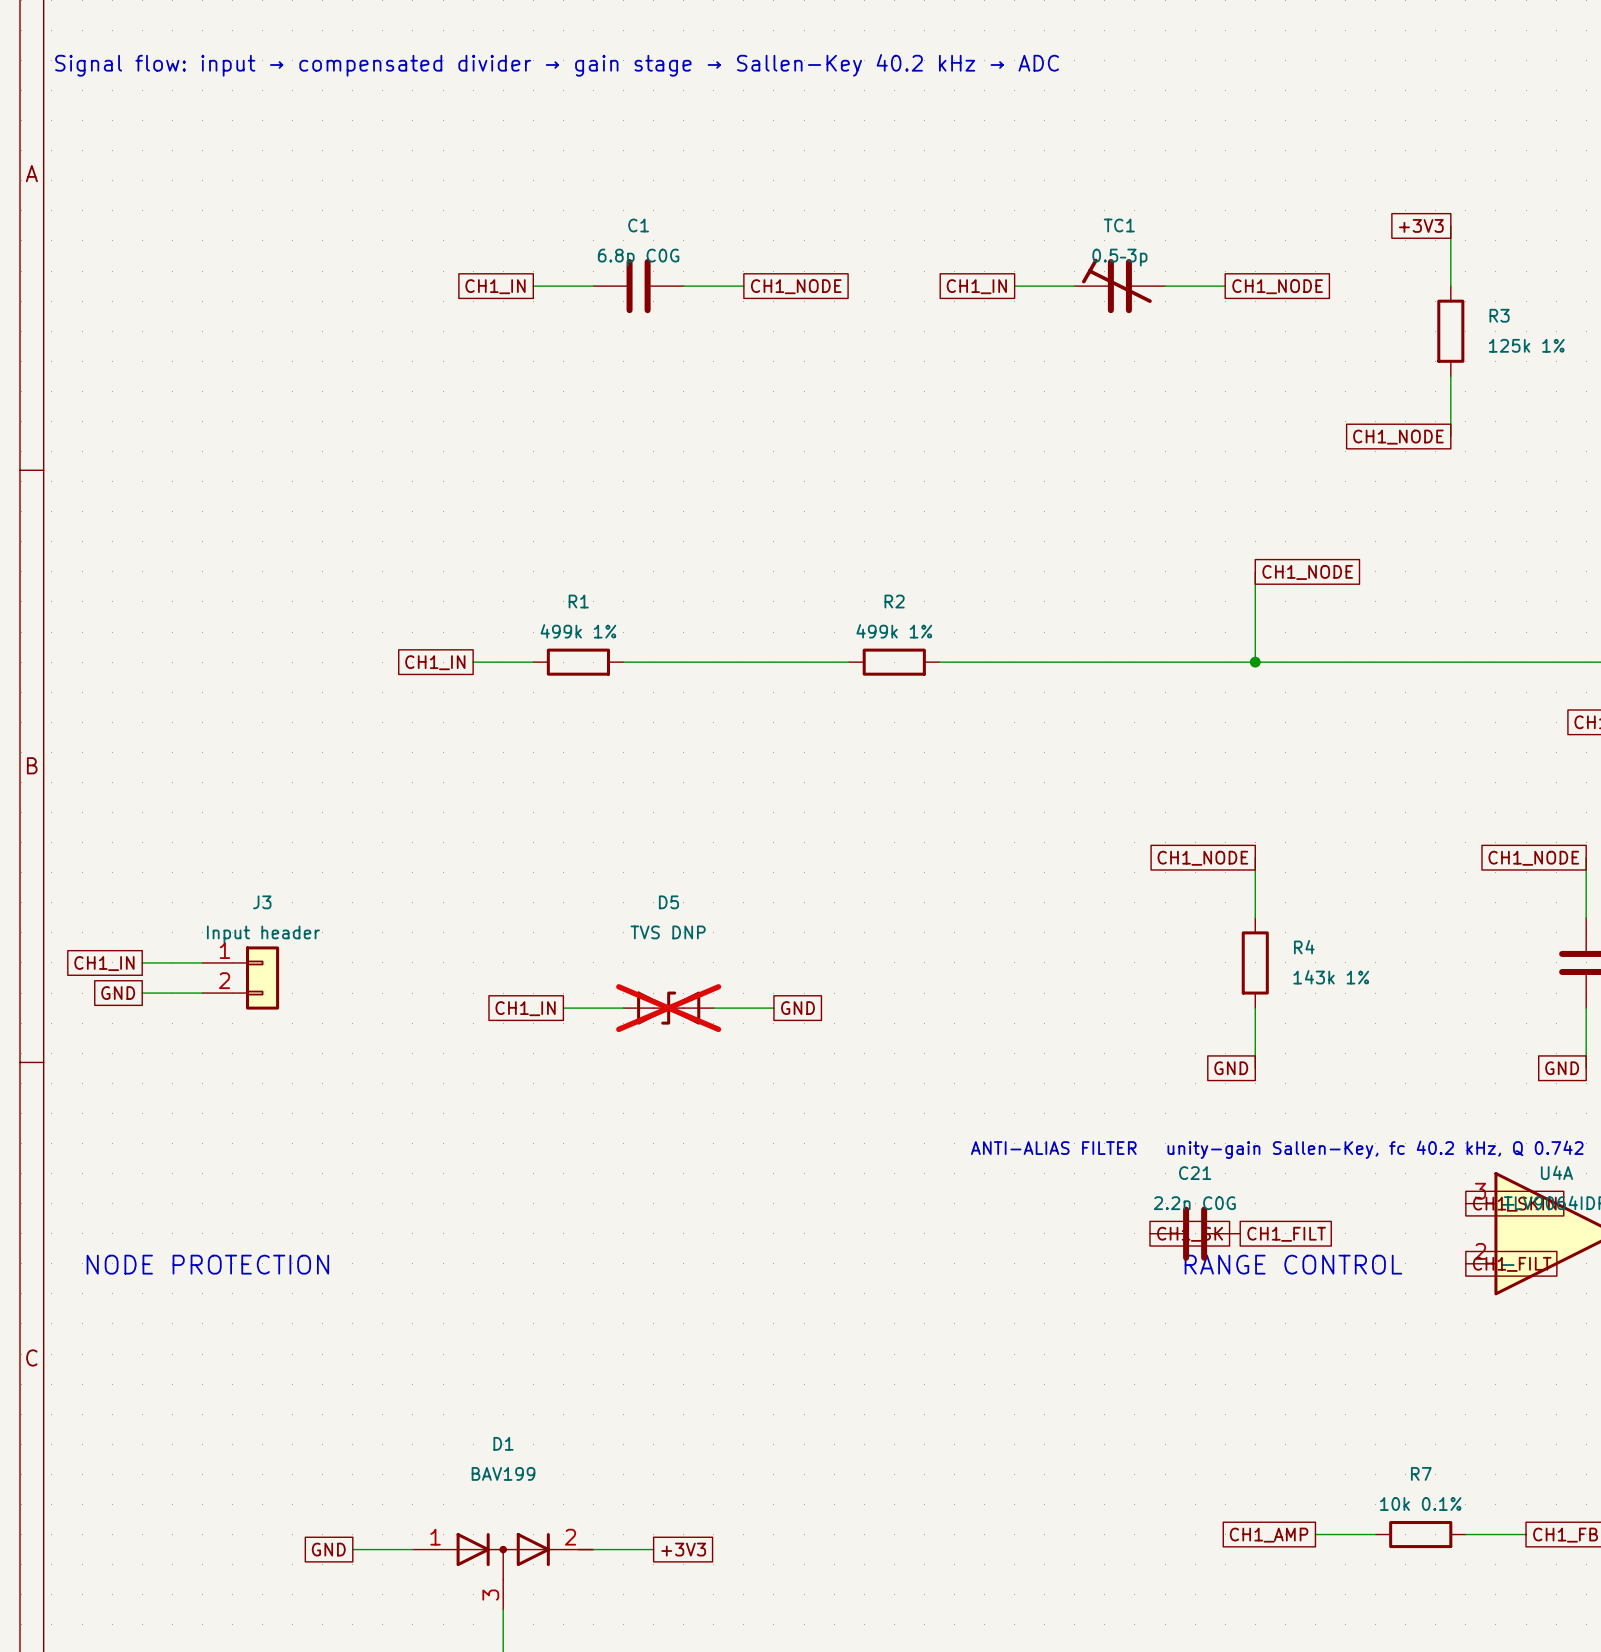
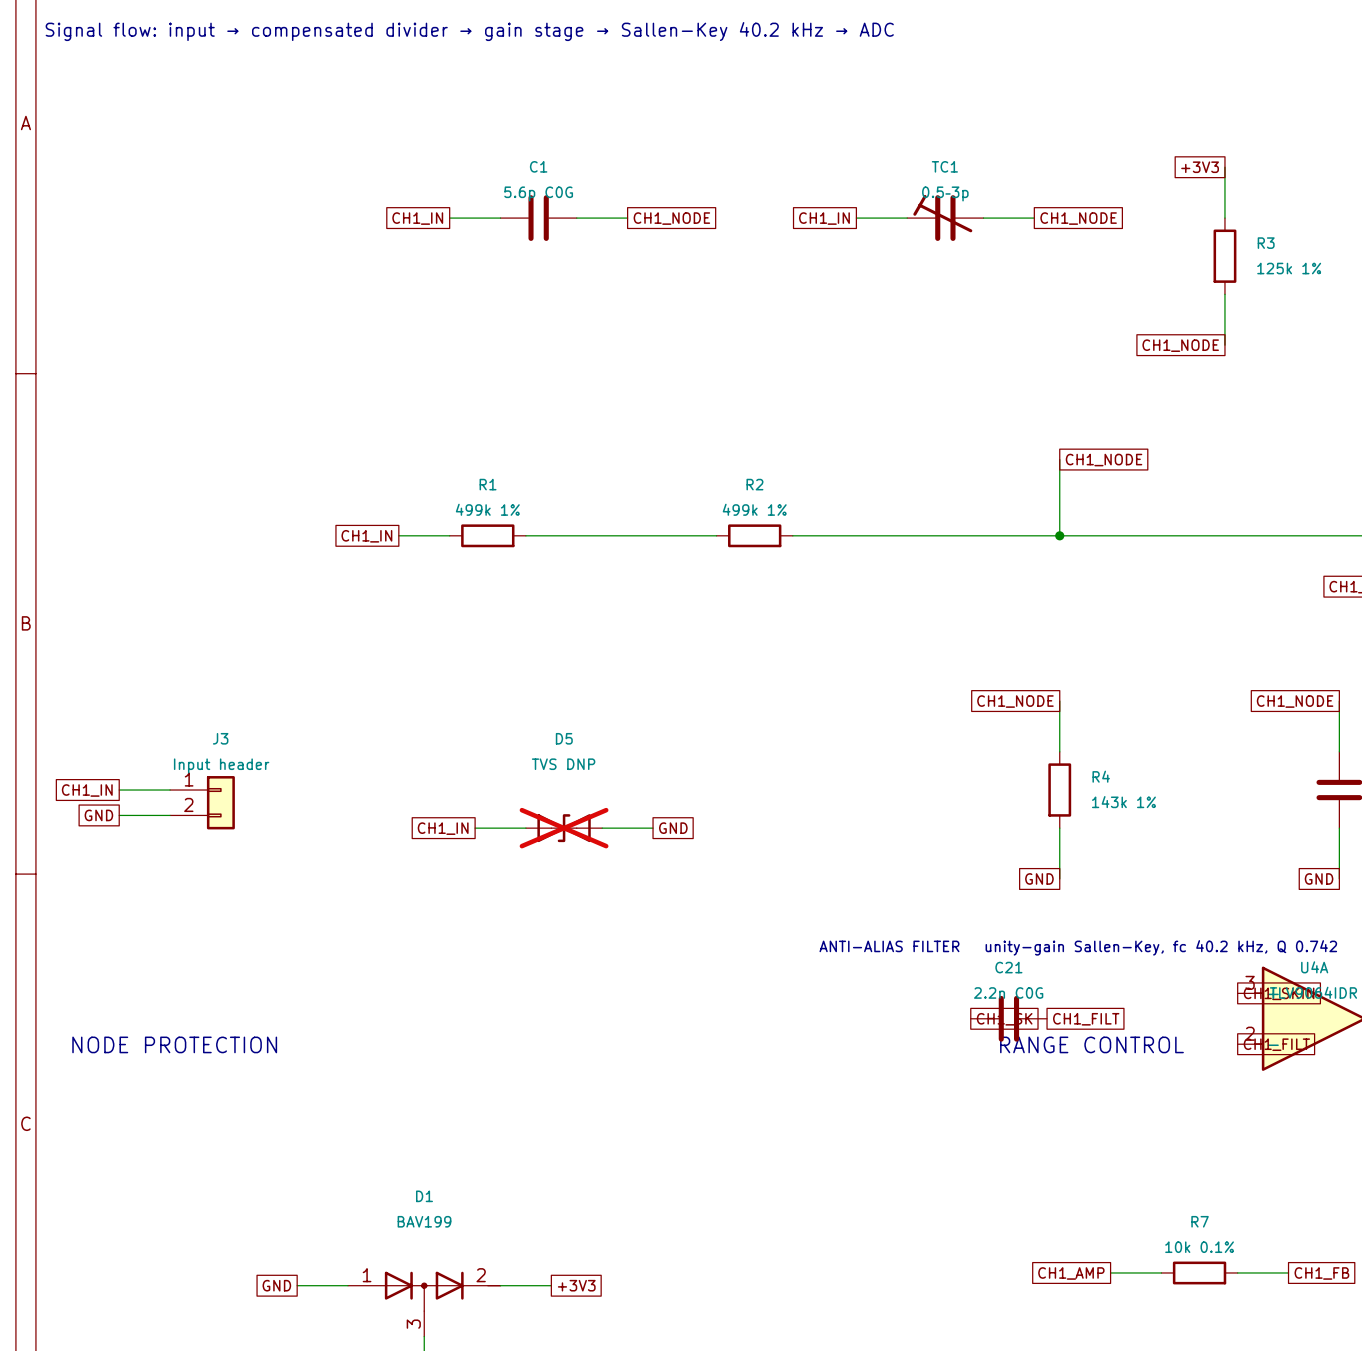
C1 value: 6.8p C0G (638, 257) -> 5.6p C0G (538, 193)

